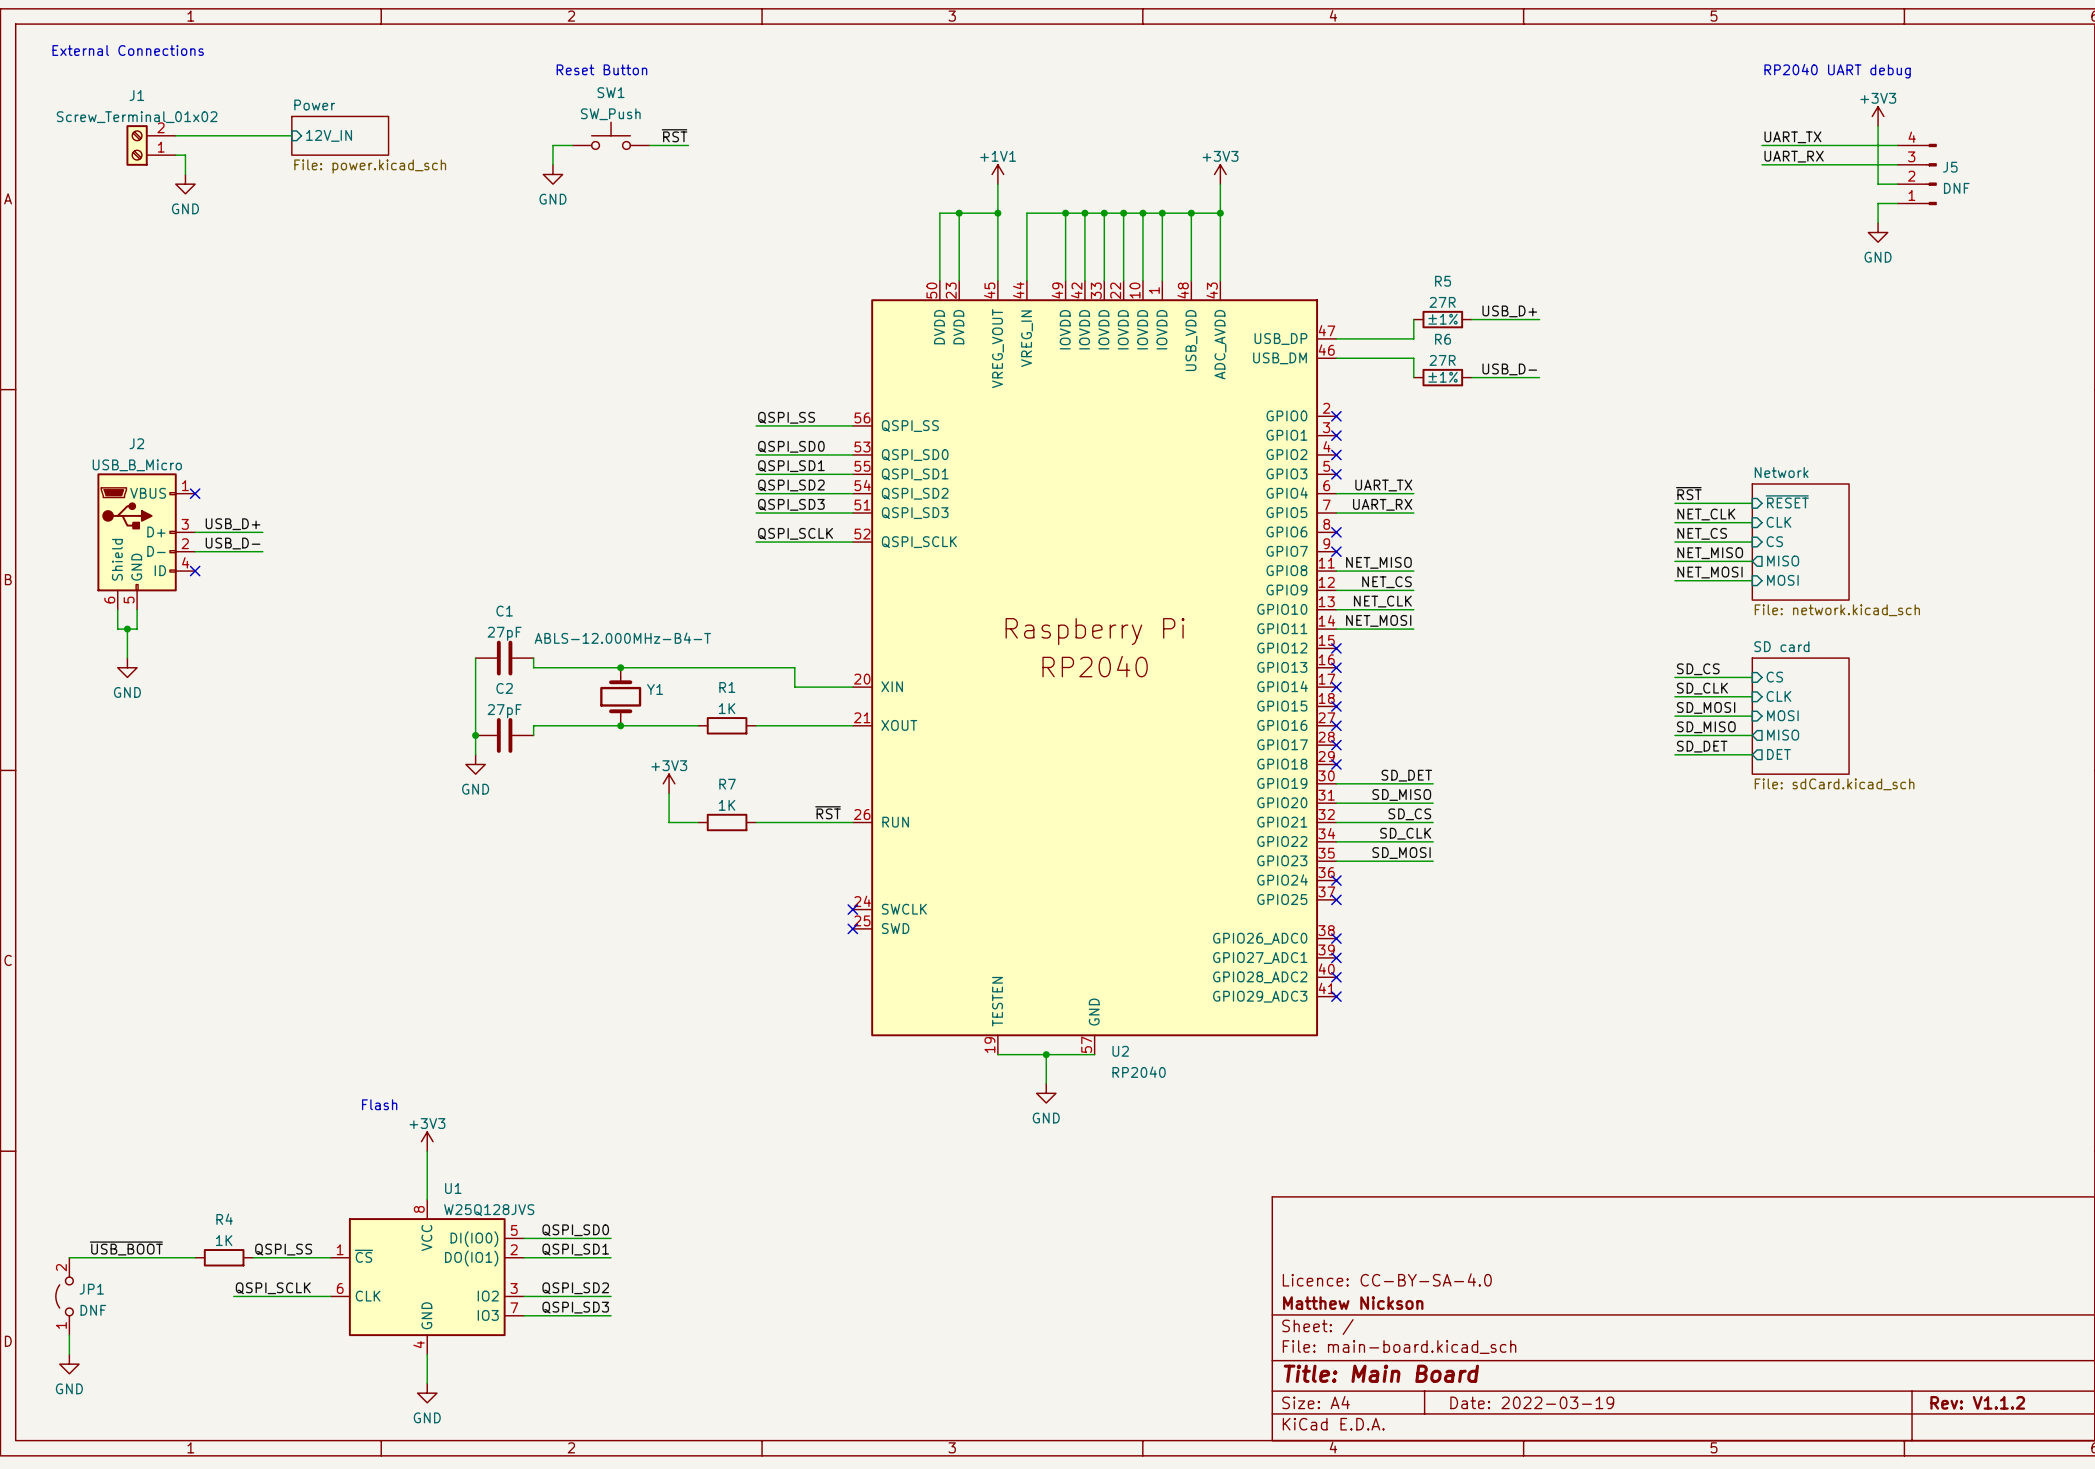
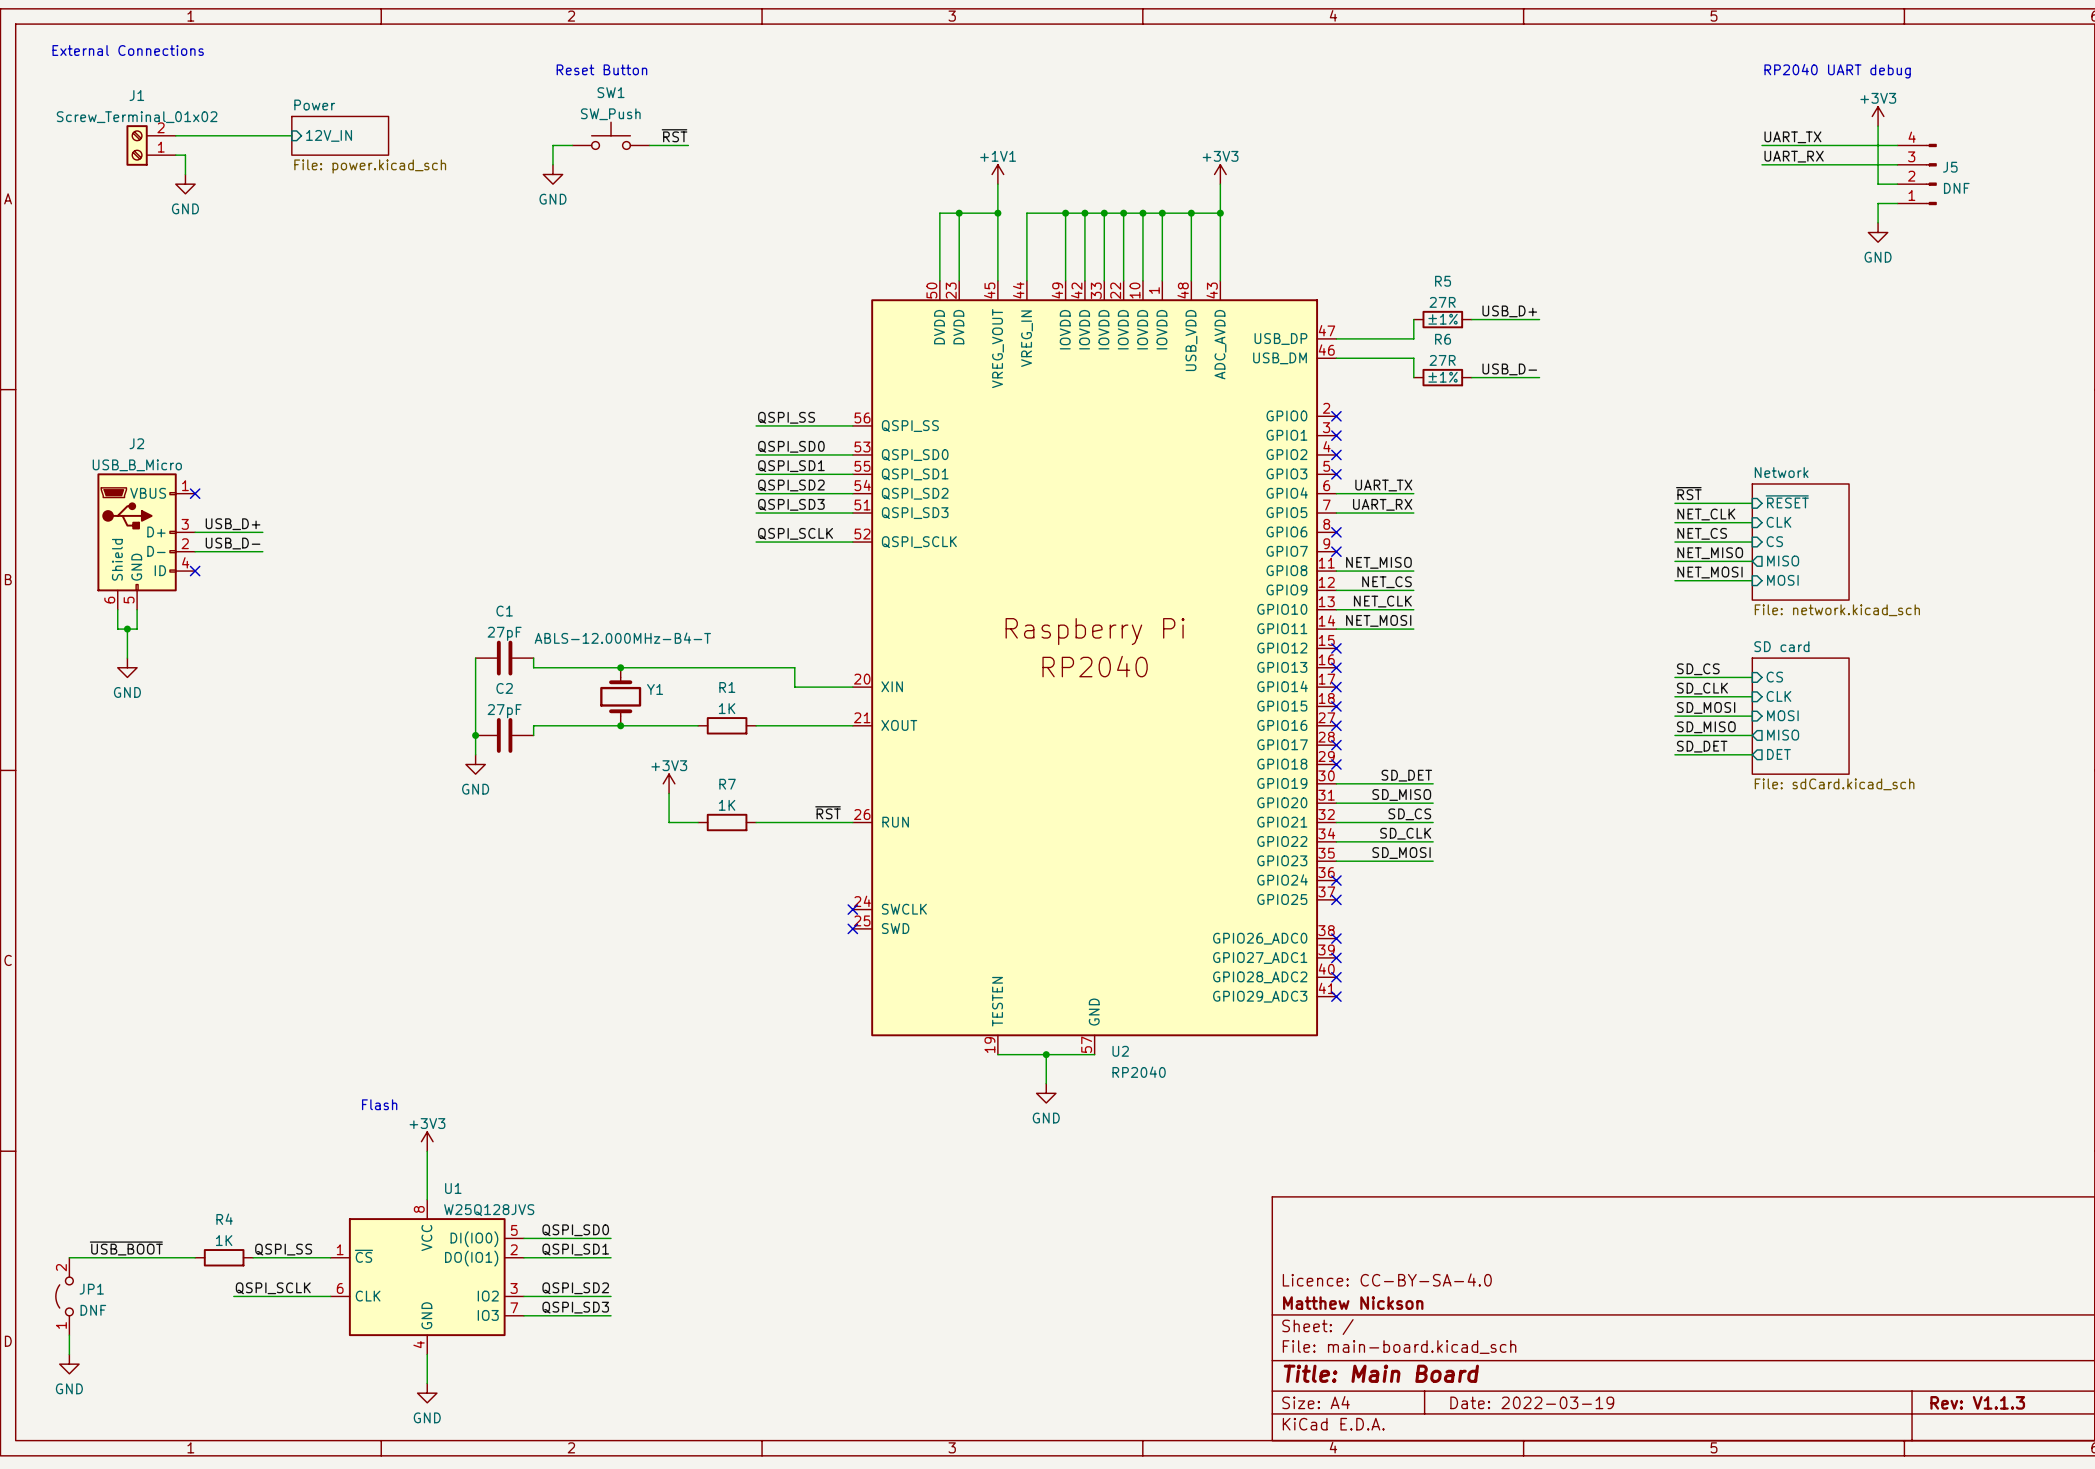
title block: Rev: V1.1.2 (1977, 1402) -> Rev: V1.1.3 (1977, 1402)

